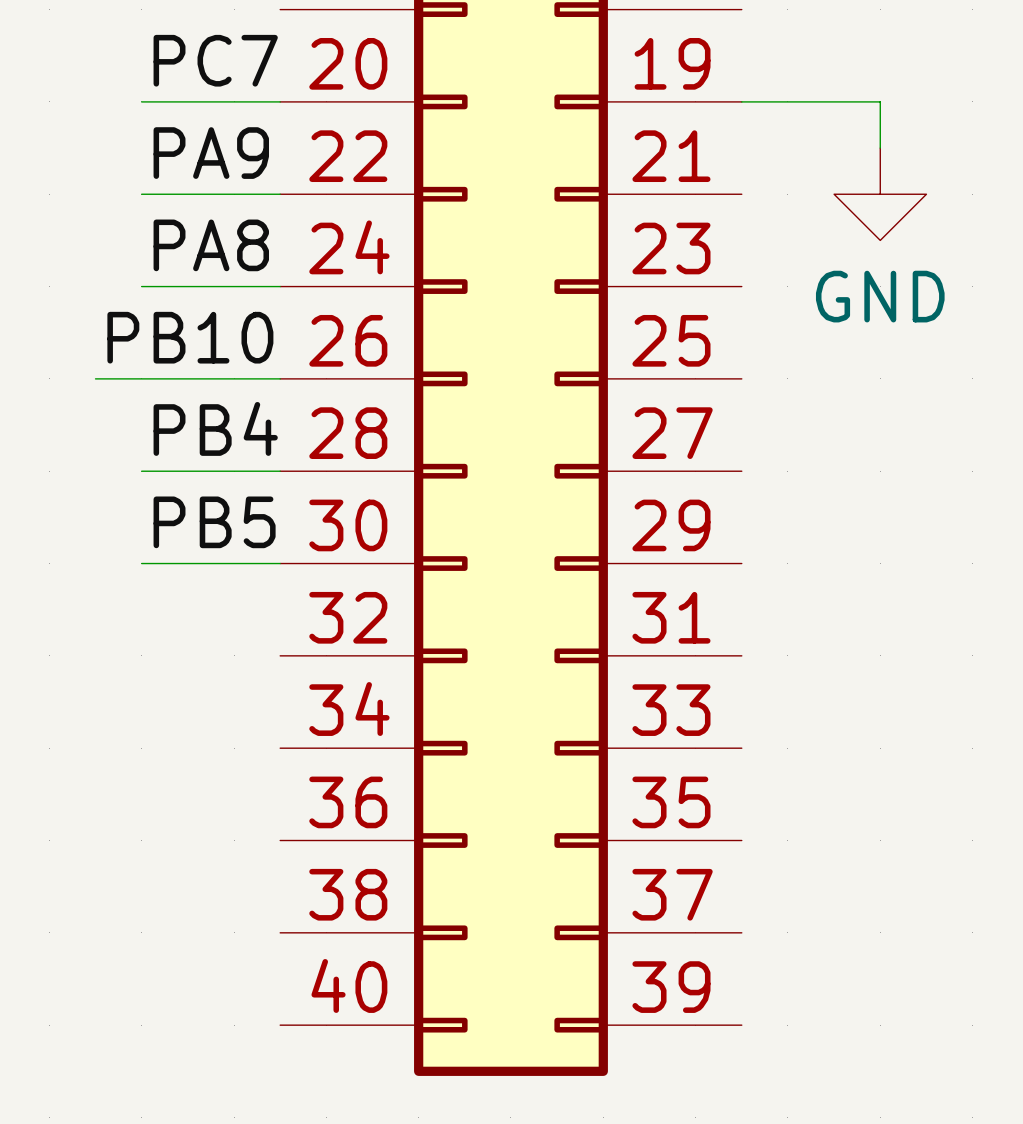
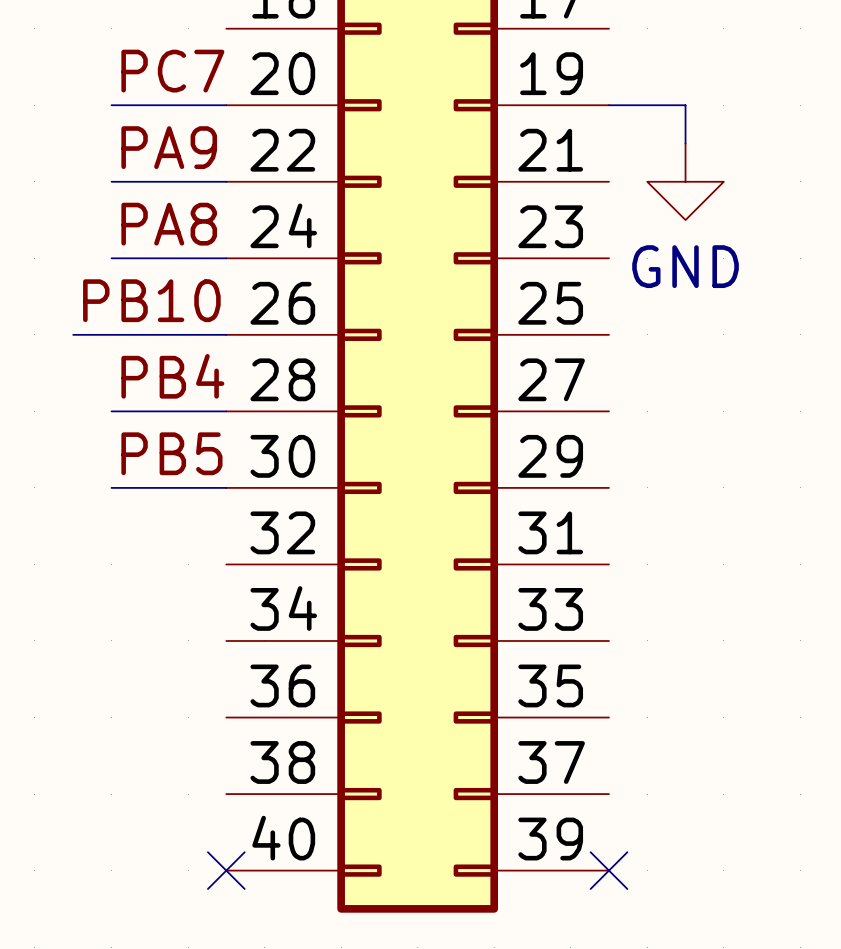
wire: (834, 101) (880, 101) (880, 148) -> (685, 105) (685, 143)
power symbol position: GND (880, 194) -> GND (685, 181)
no-connect mark: none -> (226, 870)
no-connect mark: none -> (608, 870)

